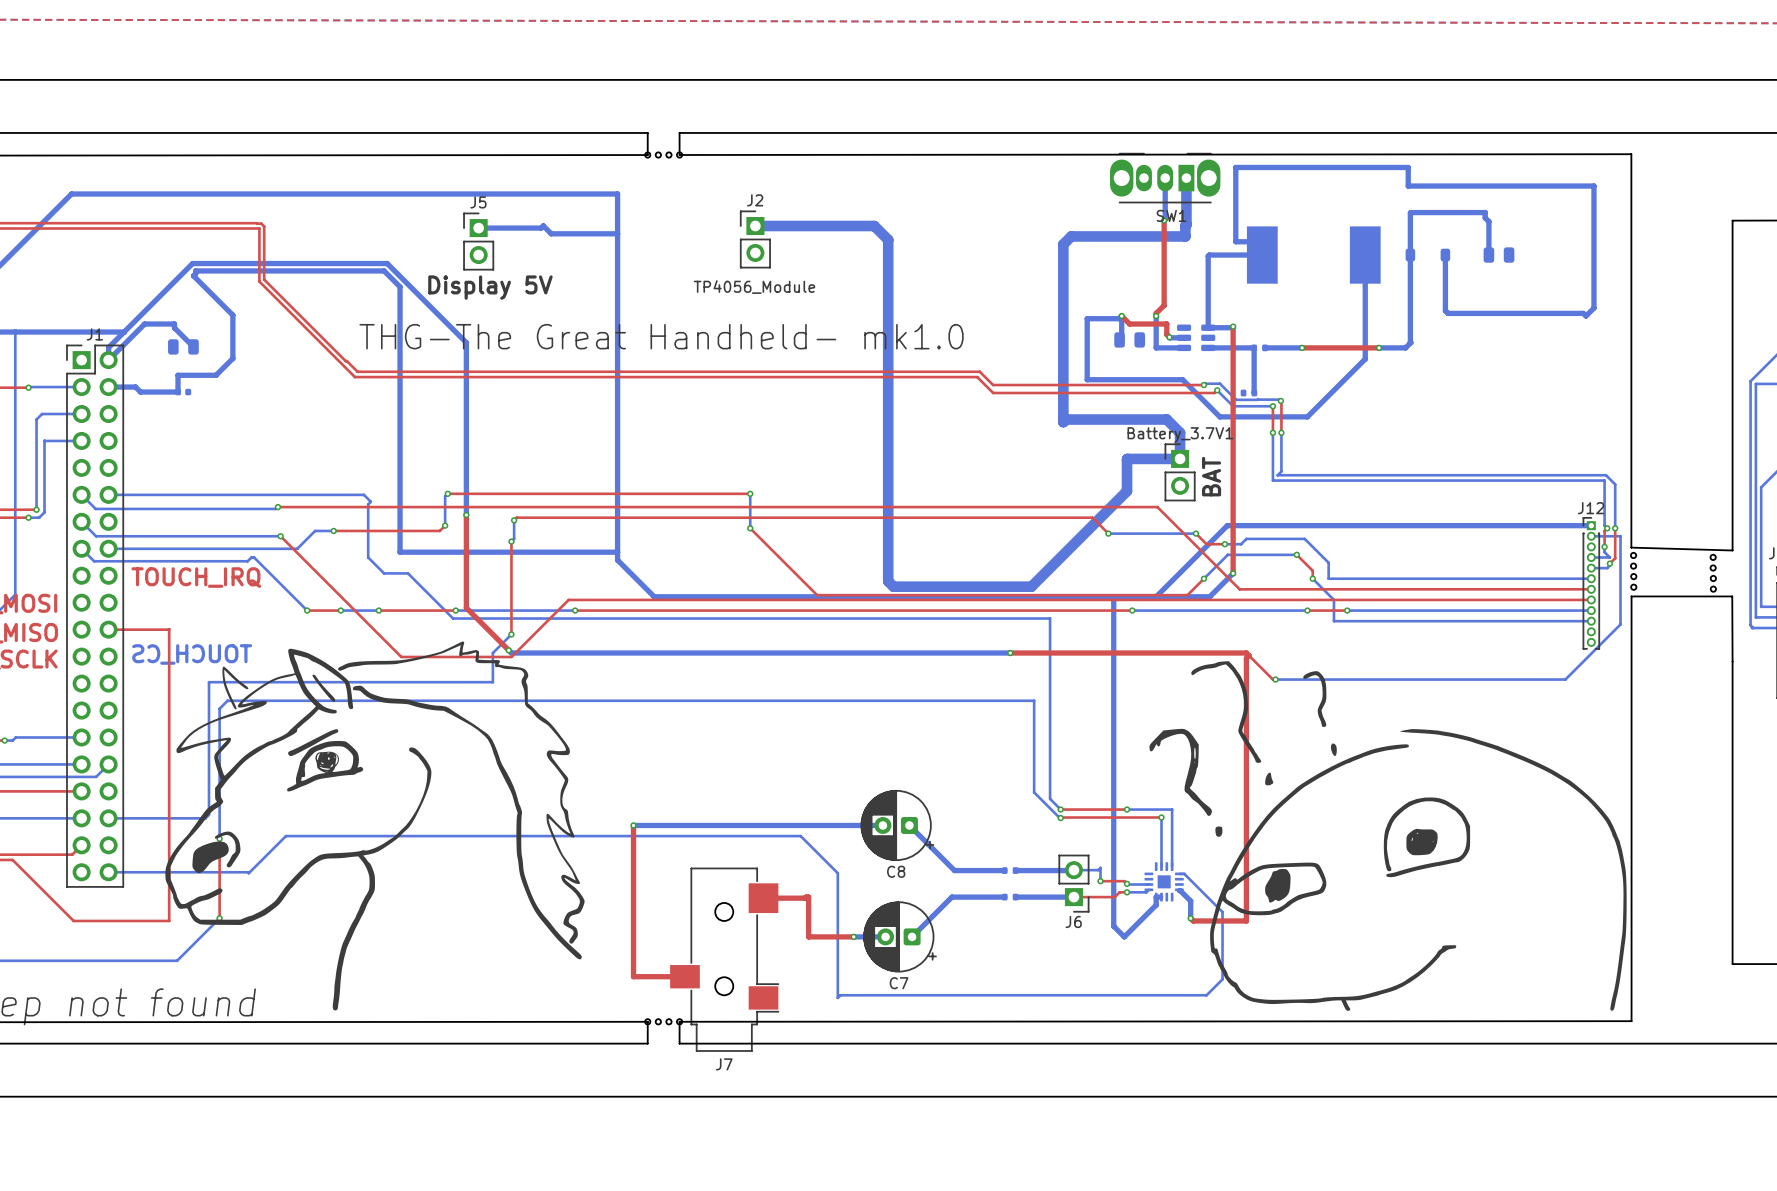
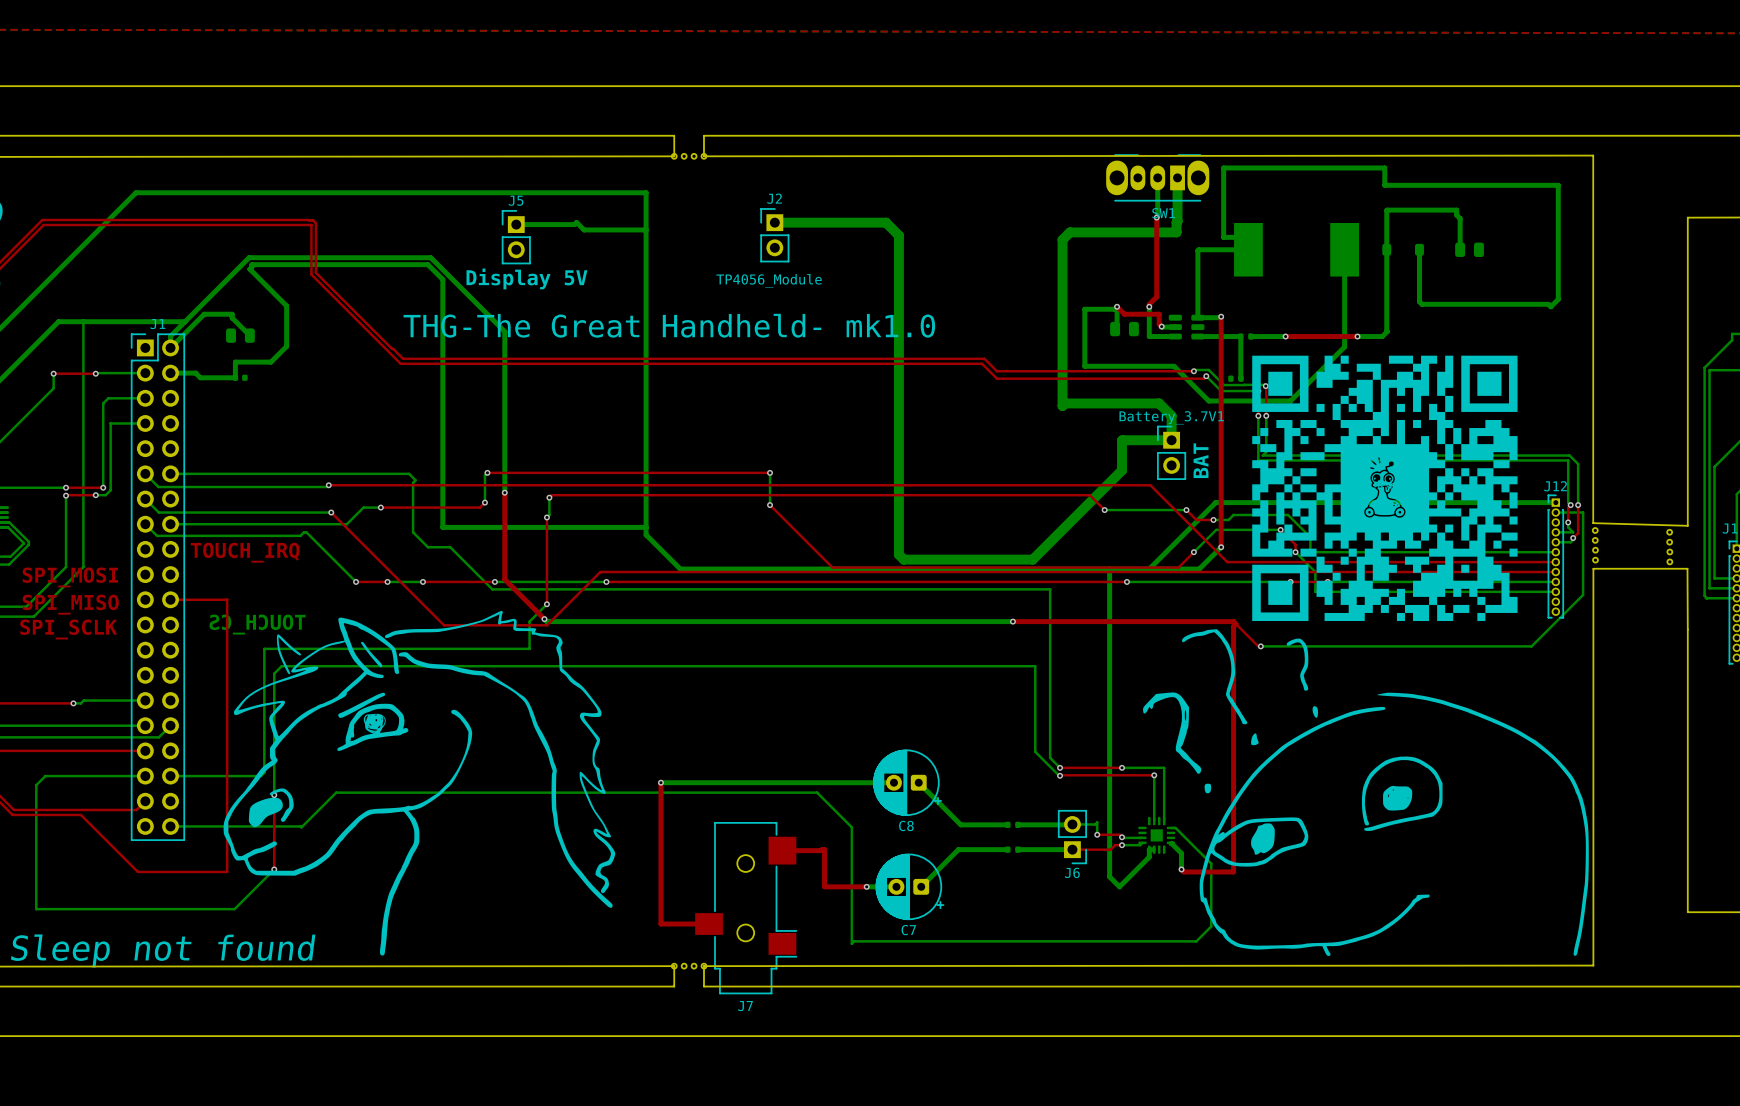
part: none -> (1384, 488)

